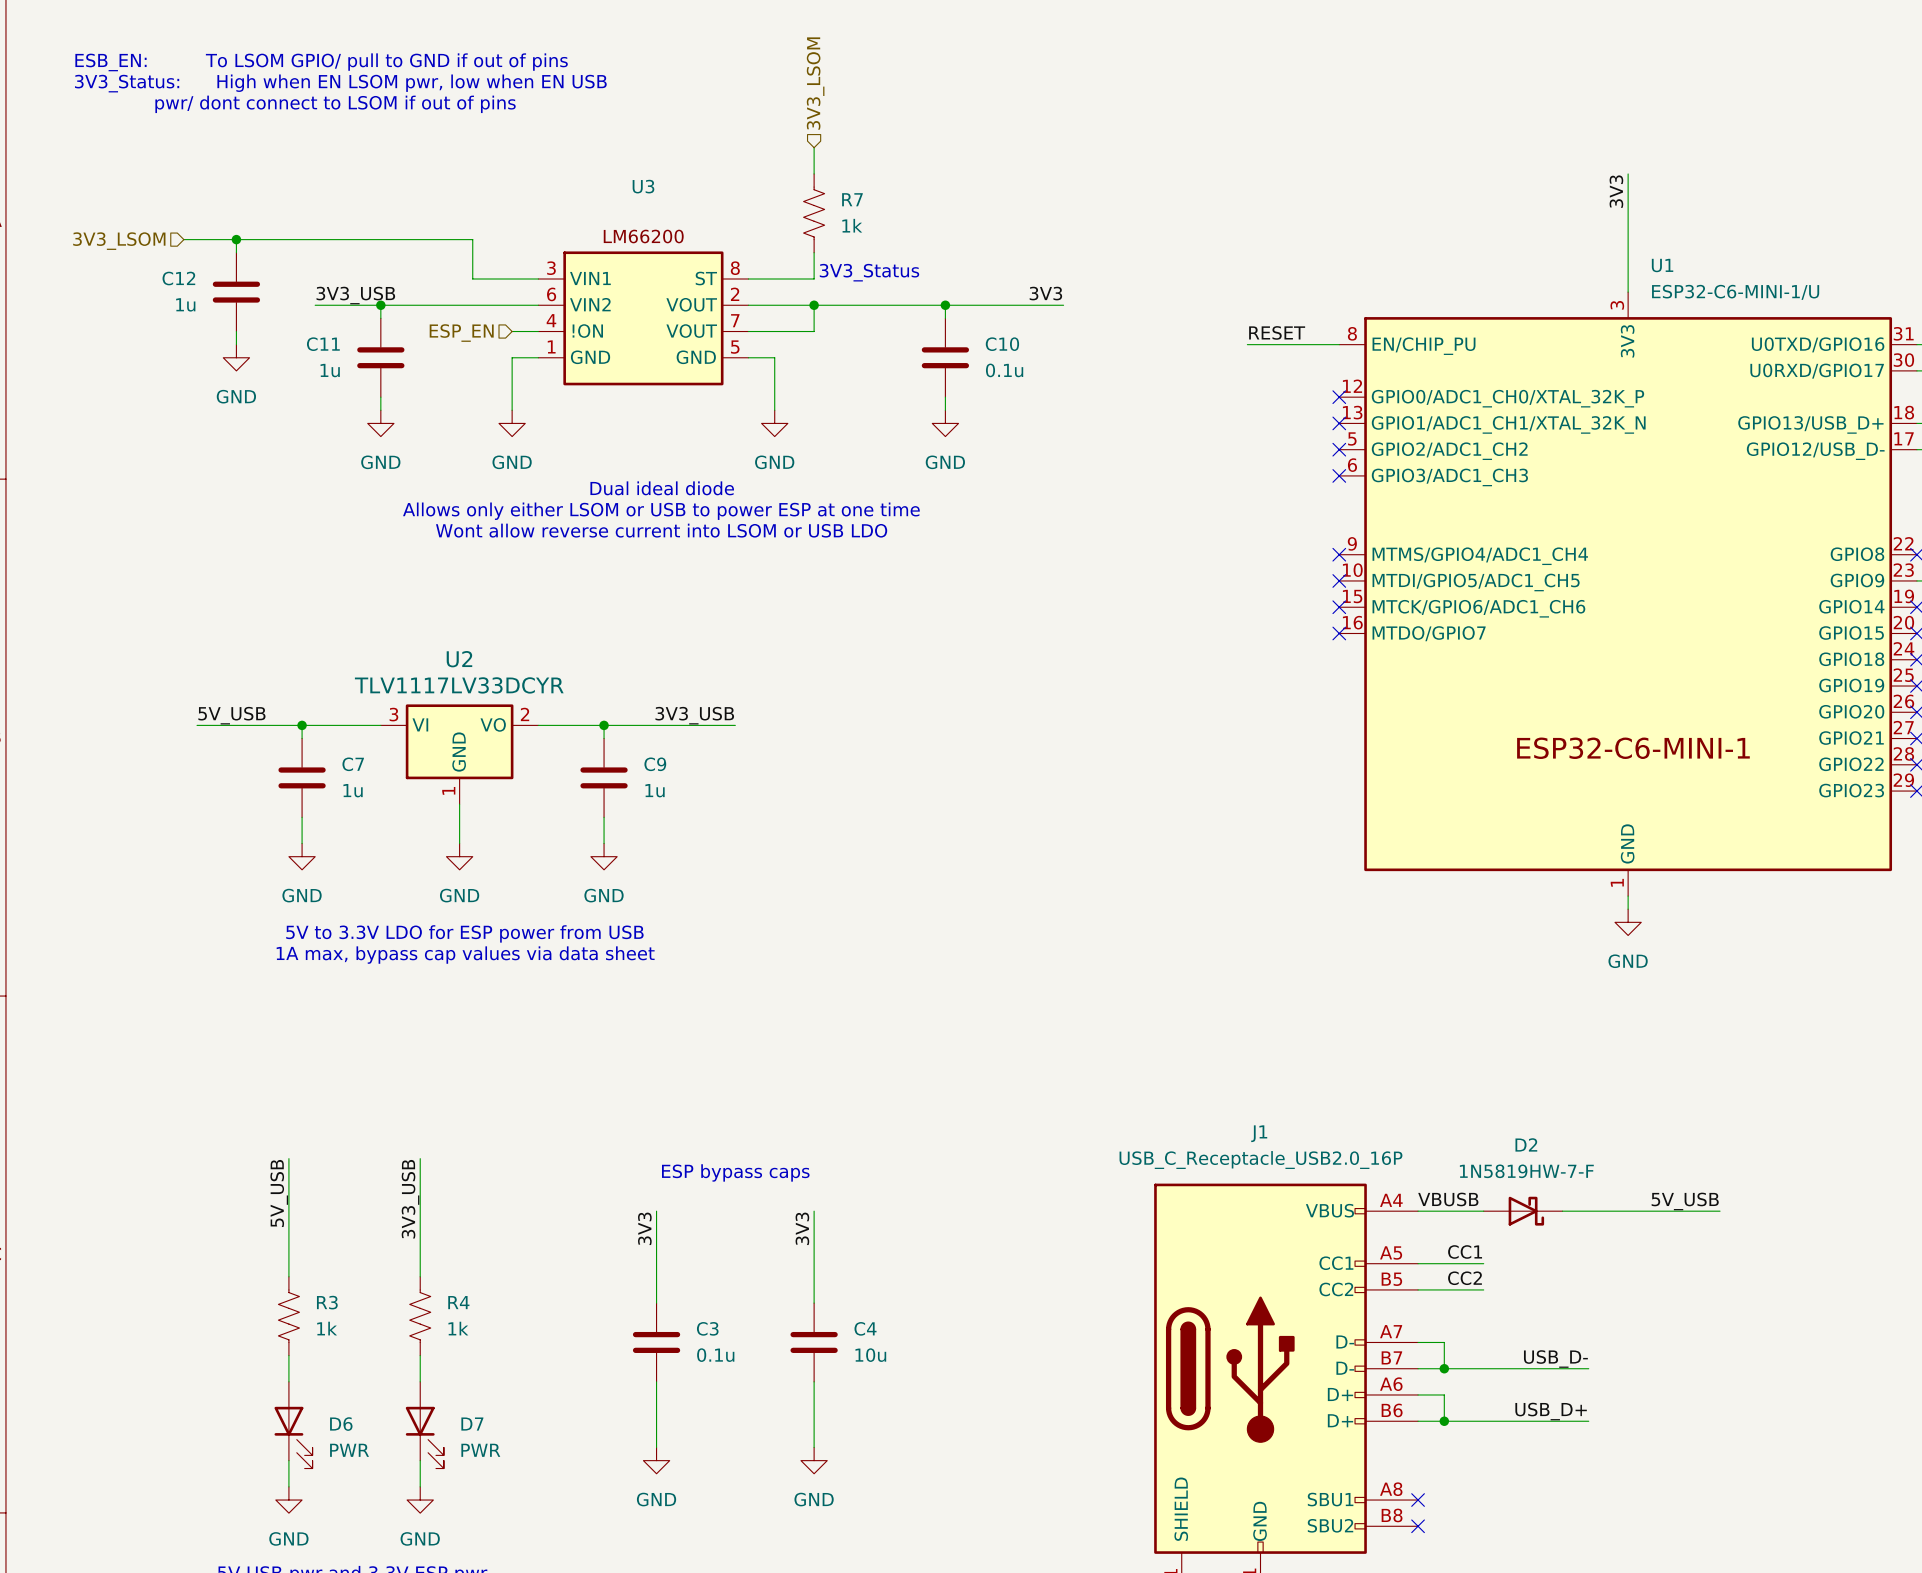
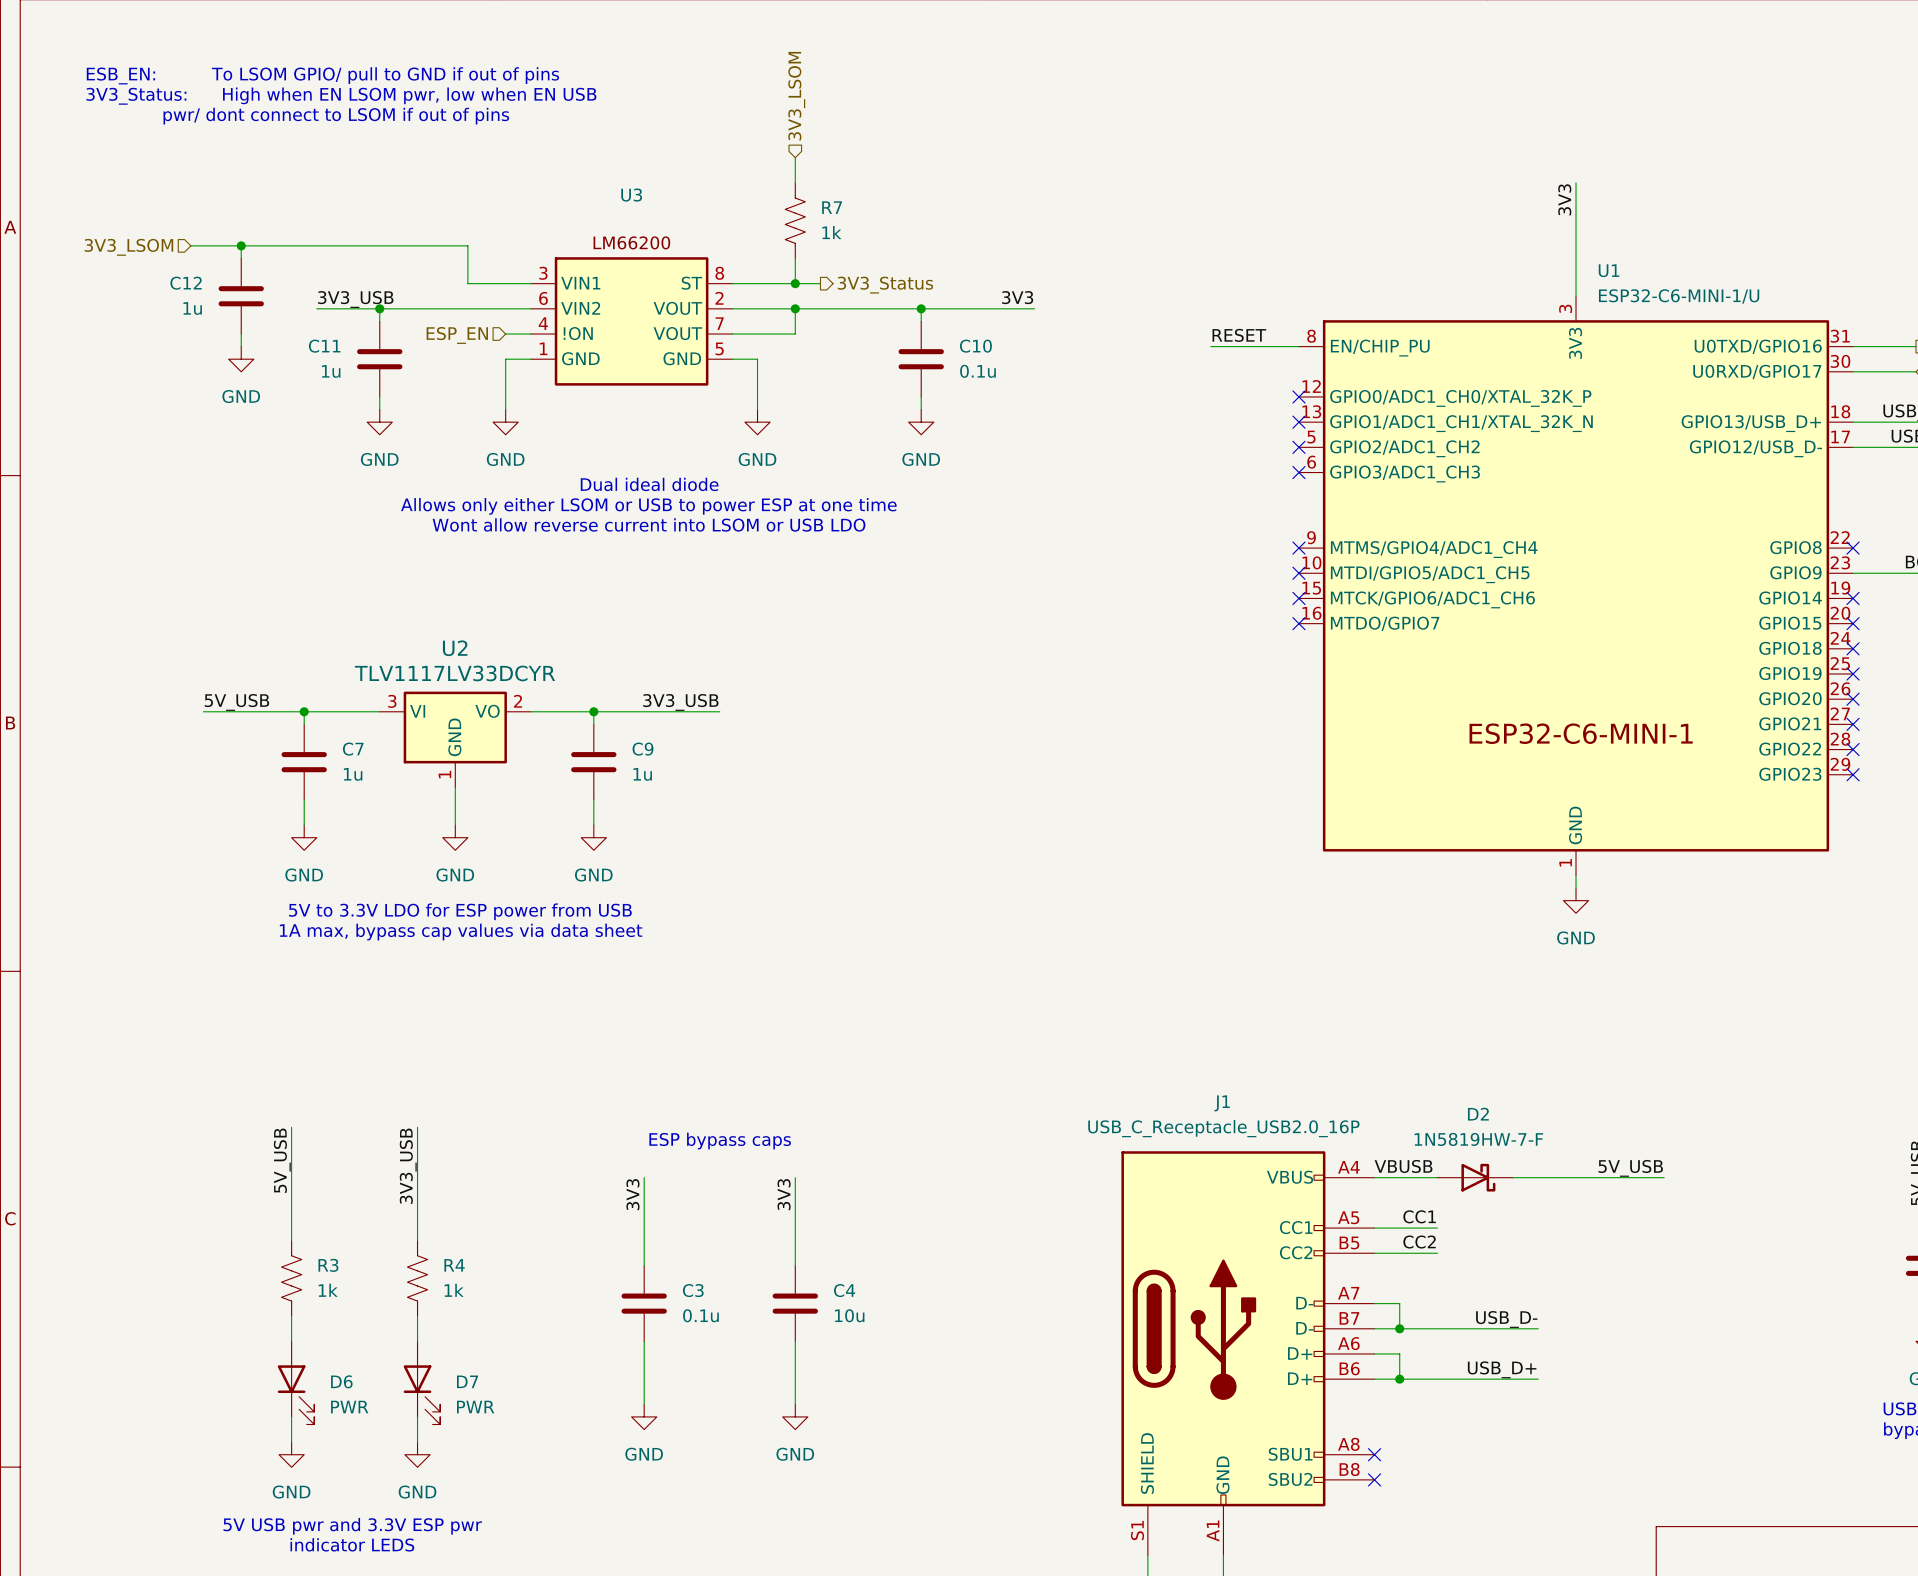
text: 3V3_Status (869, 272) -> none
wire: none -> (795, 283) (820, 283)
junction: none -> (795, 283)
hierarchical label: none -> 3V3_Status (885, 285)

